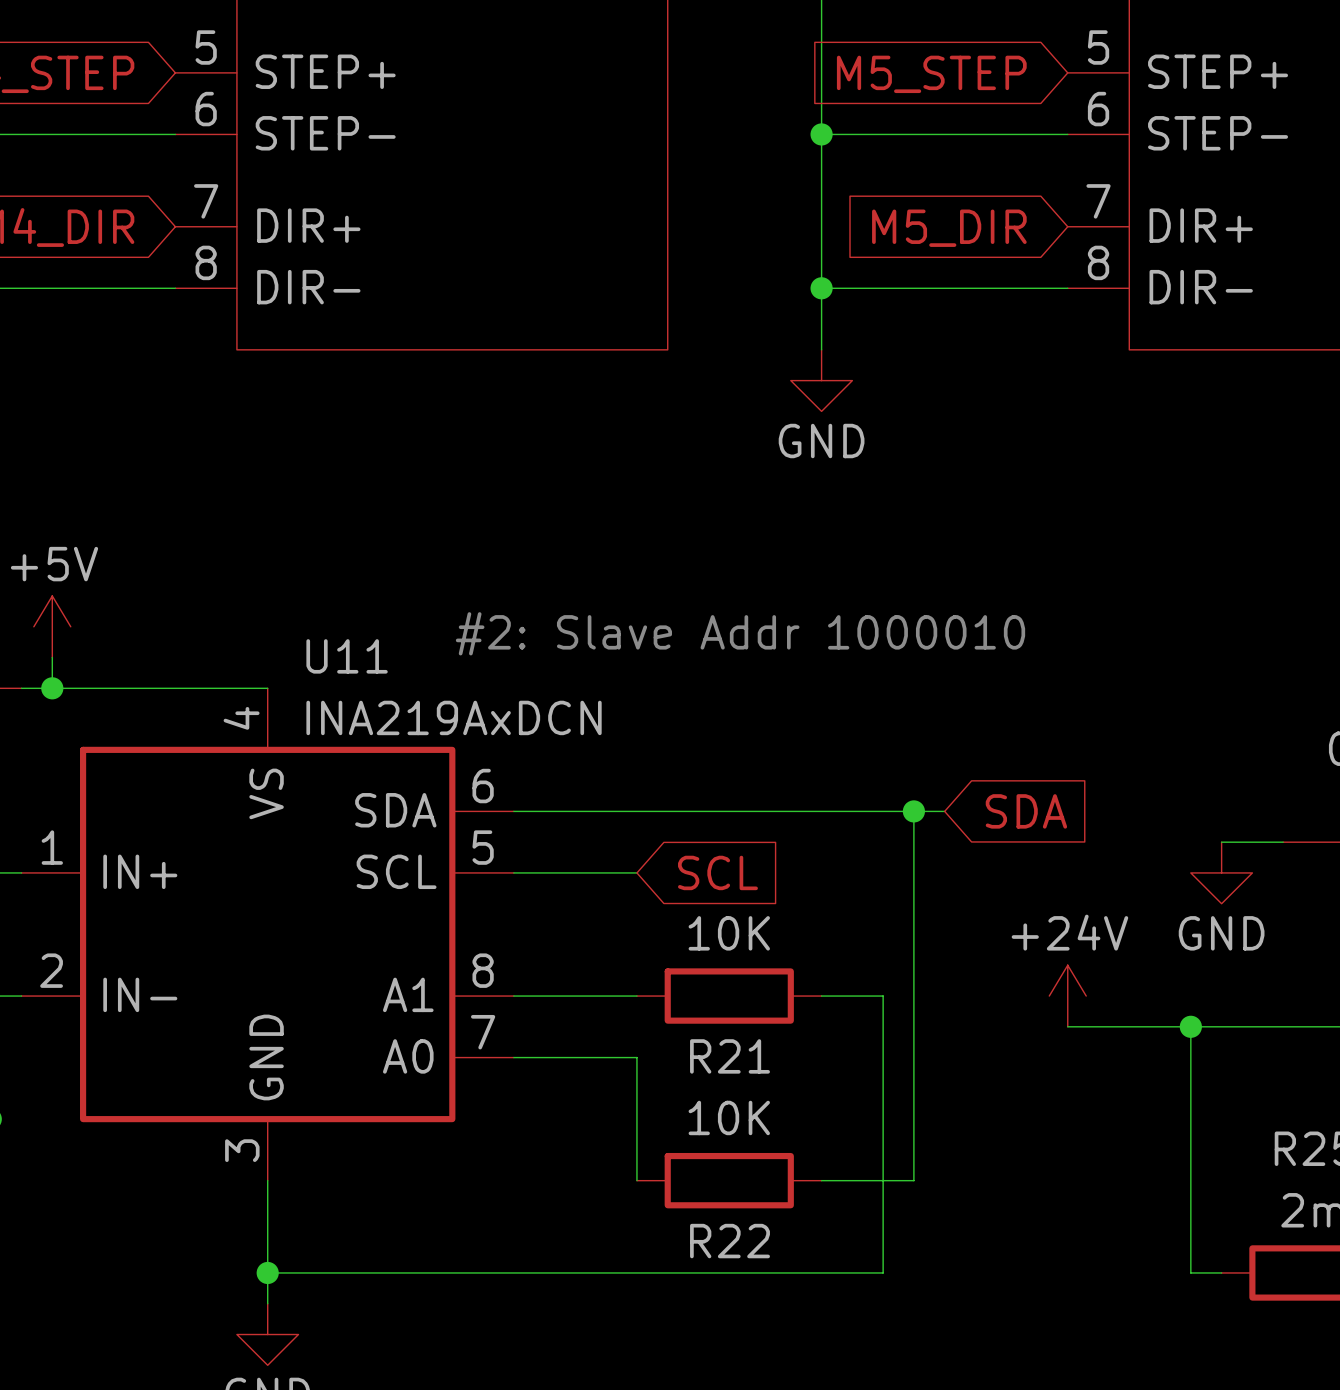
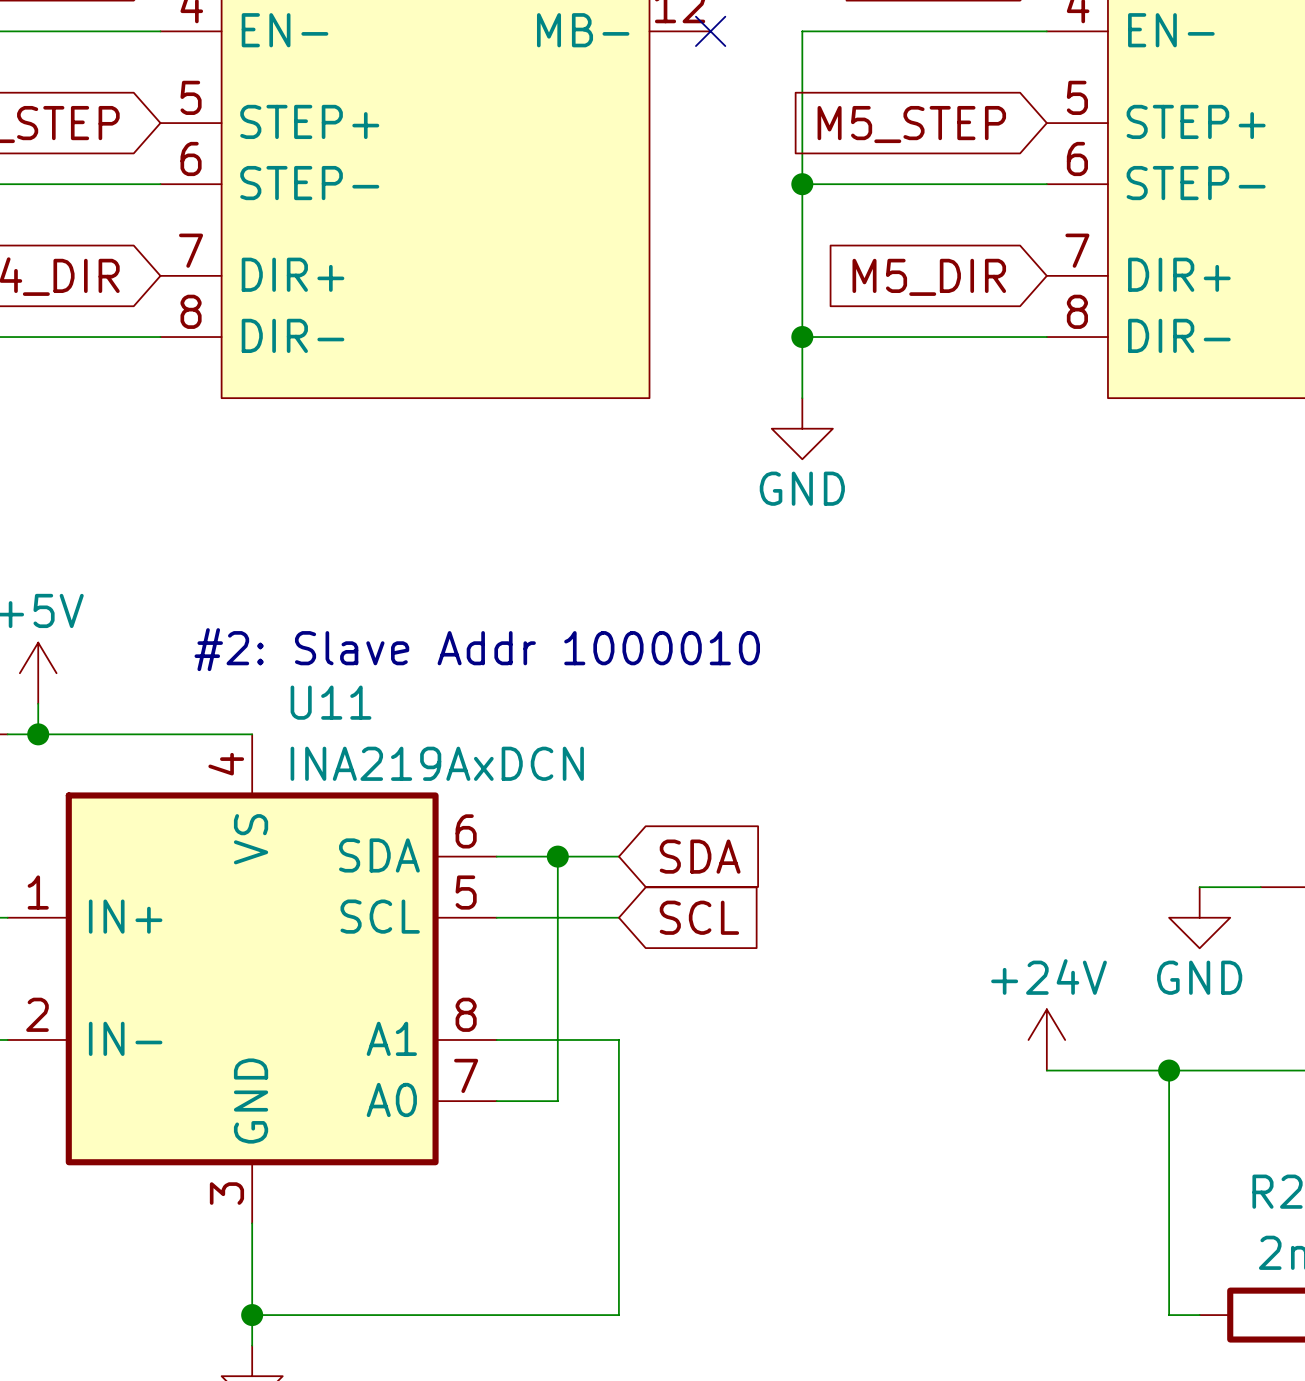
text position: #2: Slave Addr 1000010 (740, 633) -> #2: Slave Addr 1000010 (477, 649)
wire: none -> (557, 856) (557, 1101)
junction: none -> (557, 856)
wire: (636, 811) (944, 811) -> none
wire: (913, 811) (913, 1180) (821, 1180) -> none
junction: (913, 811) -> none
global label position: SDA (1026, 811) -> SDA (700, 856)
R21: 10K (729, 996) -> none
wire: (821, 996) (883, 996) (883, 1272) (636, 1272) -> (618, 1223) (618, 1315)
wire: (575, 1057) (636, 1057) -> (618, 1039) (618, 1101)
R22: 10K (729, 1180) -> none

